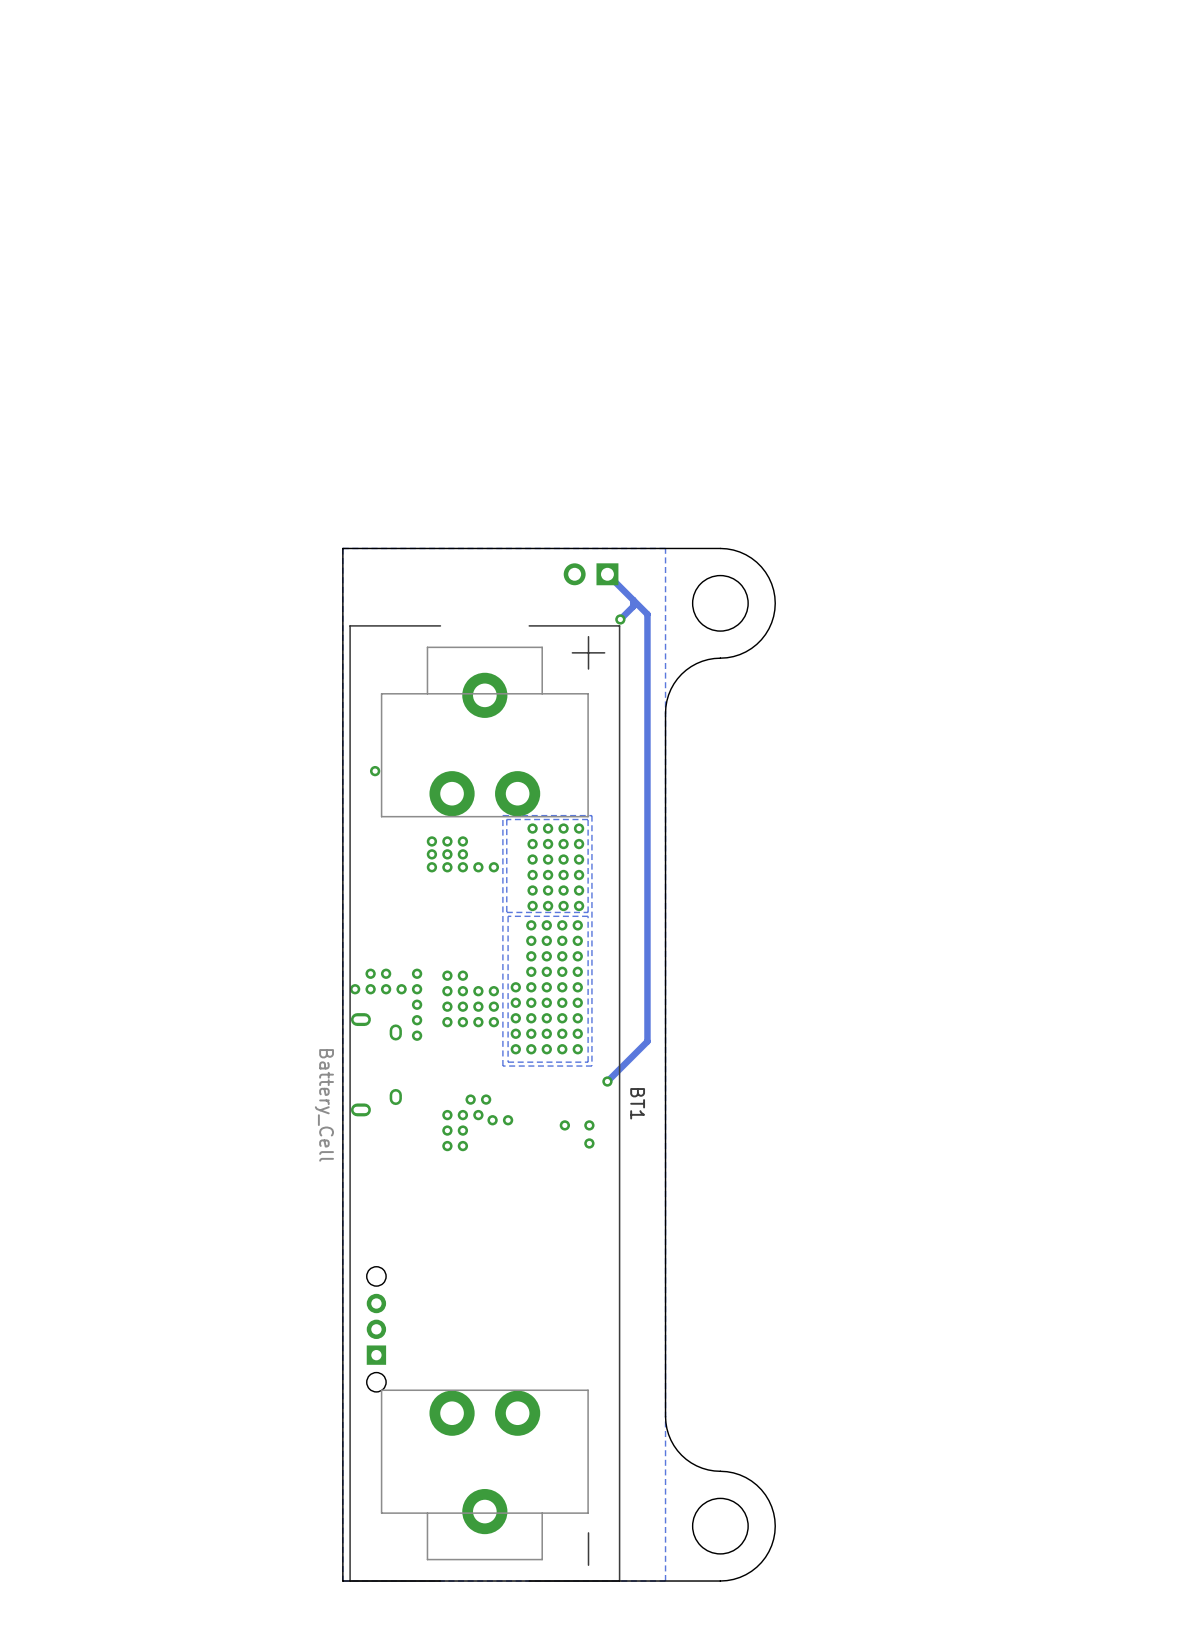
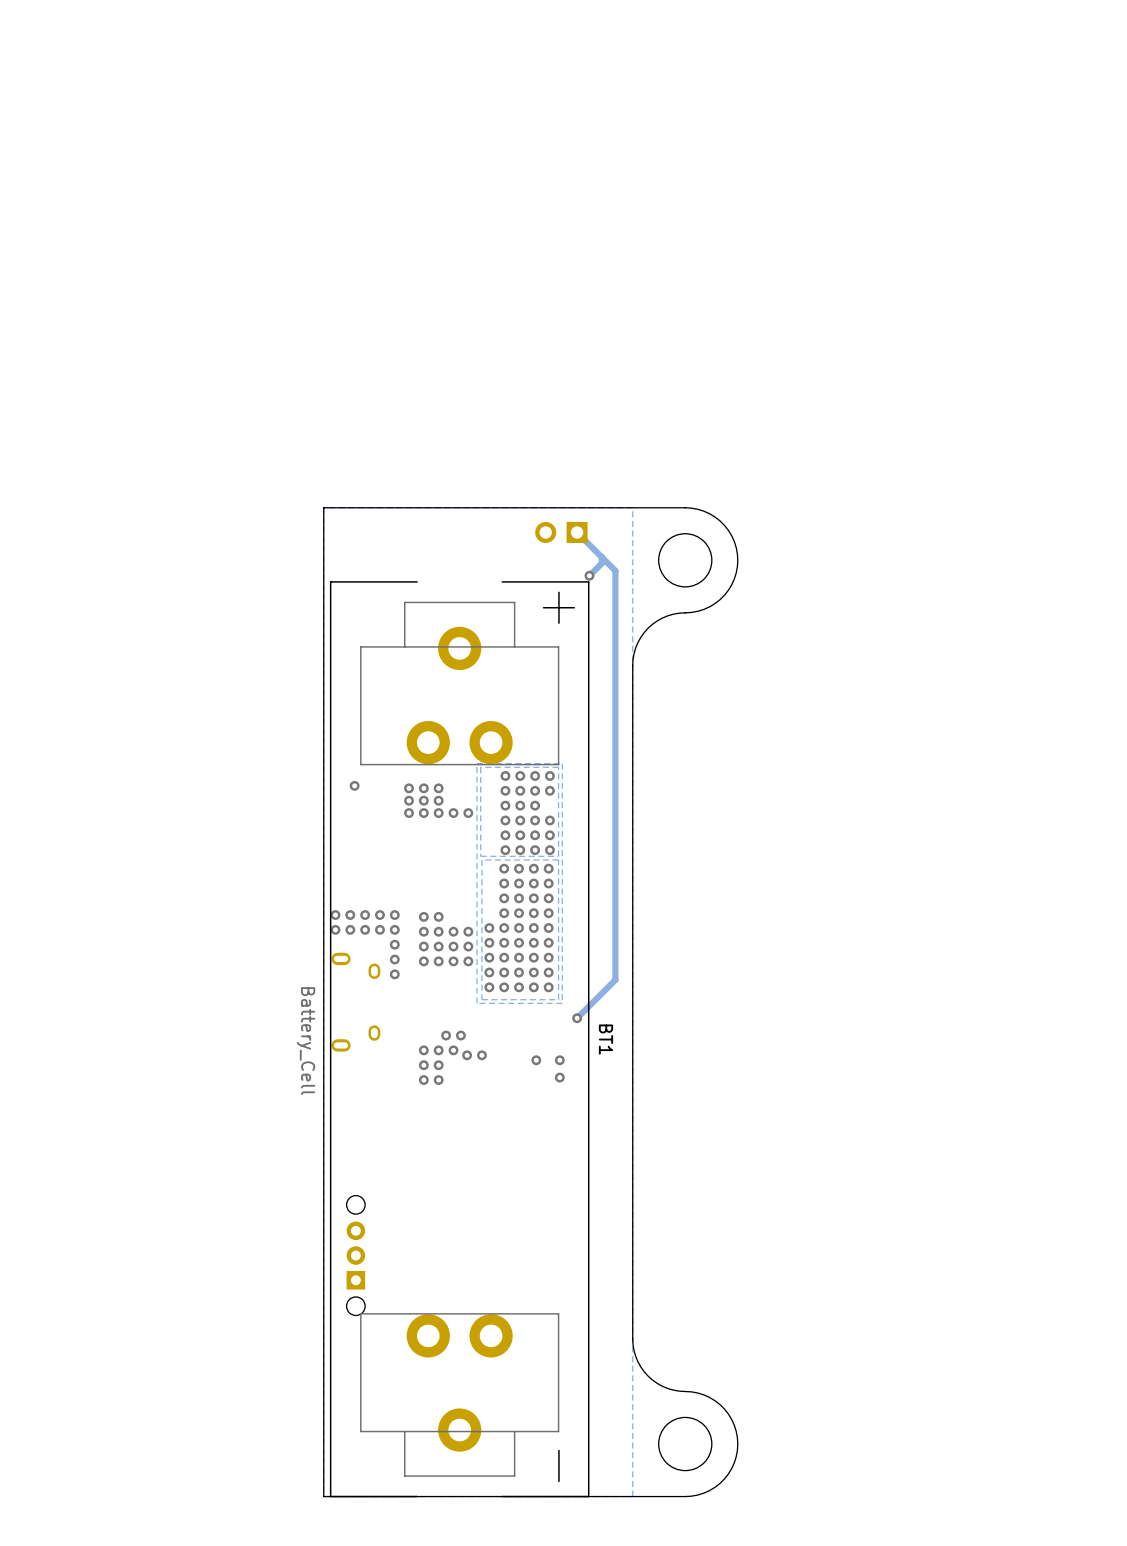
via position: (375, 771) -> (354, 785)
via: (579, 859) -> none
via: none -> (335, 915)
via: none -> (379, 915)

